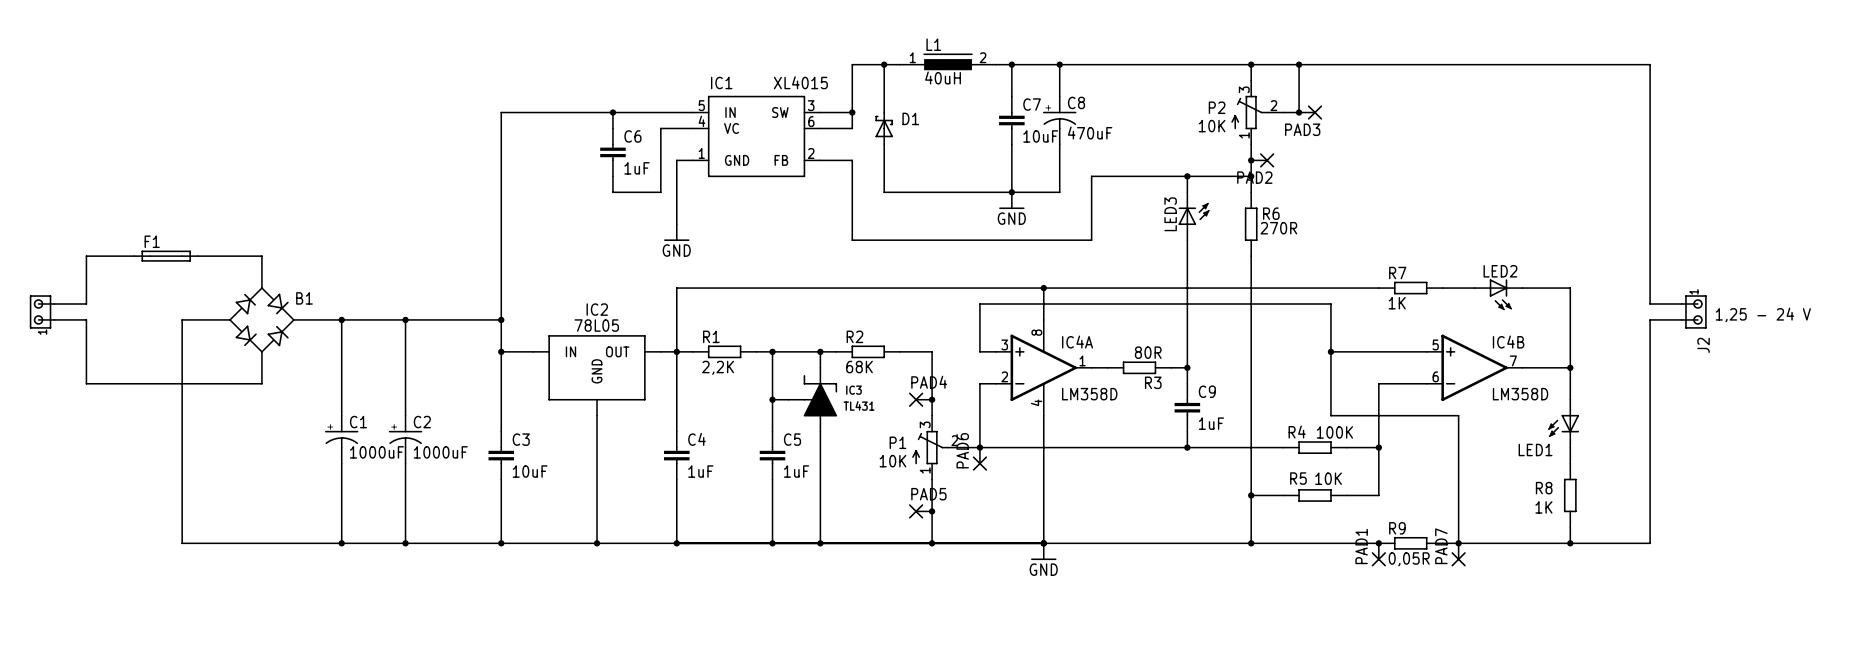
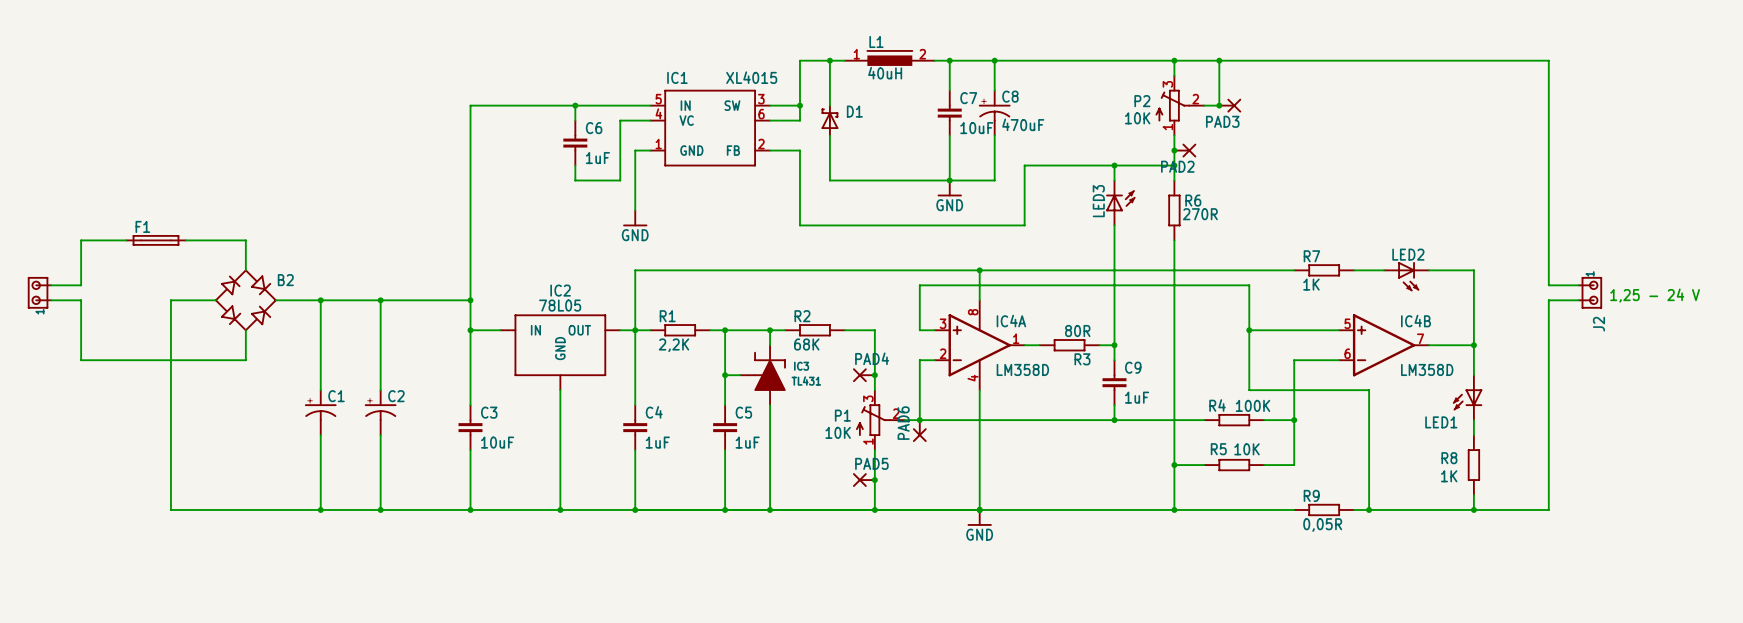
B1 name: B1 (304, 298) -> B2 (285, 280)
C1 value: 1000uF (376, 452) -> none
C2 value: 1000uF (440, 452) -> none
junction: (1378, 543) -> none
PAD1: (1378, 554) -> none
PAD7: (1458, 554) -> none

